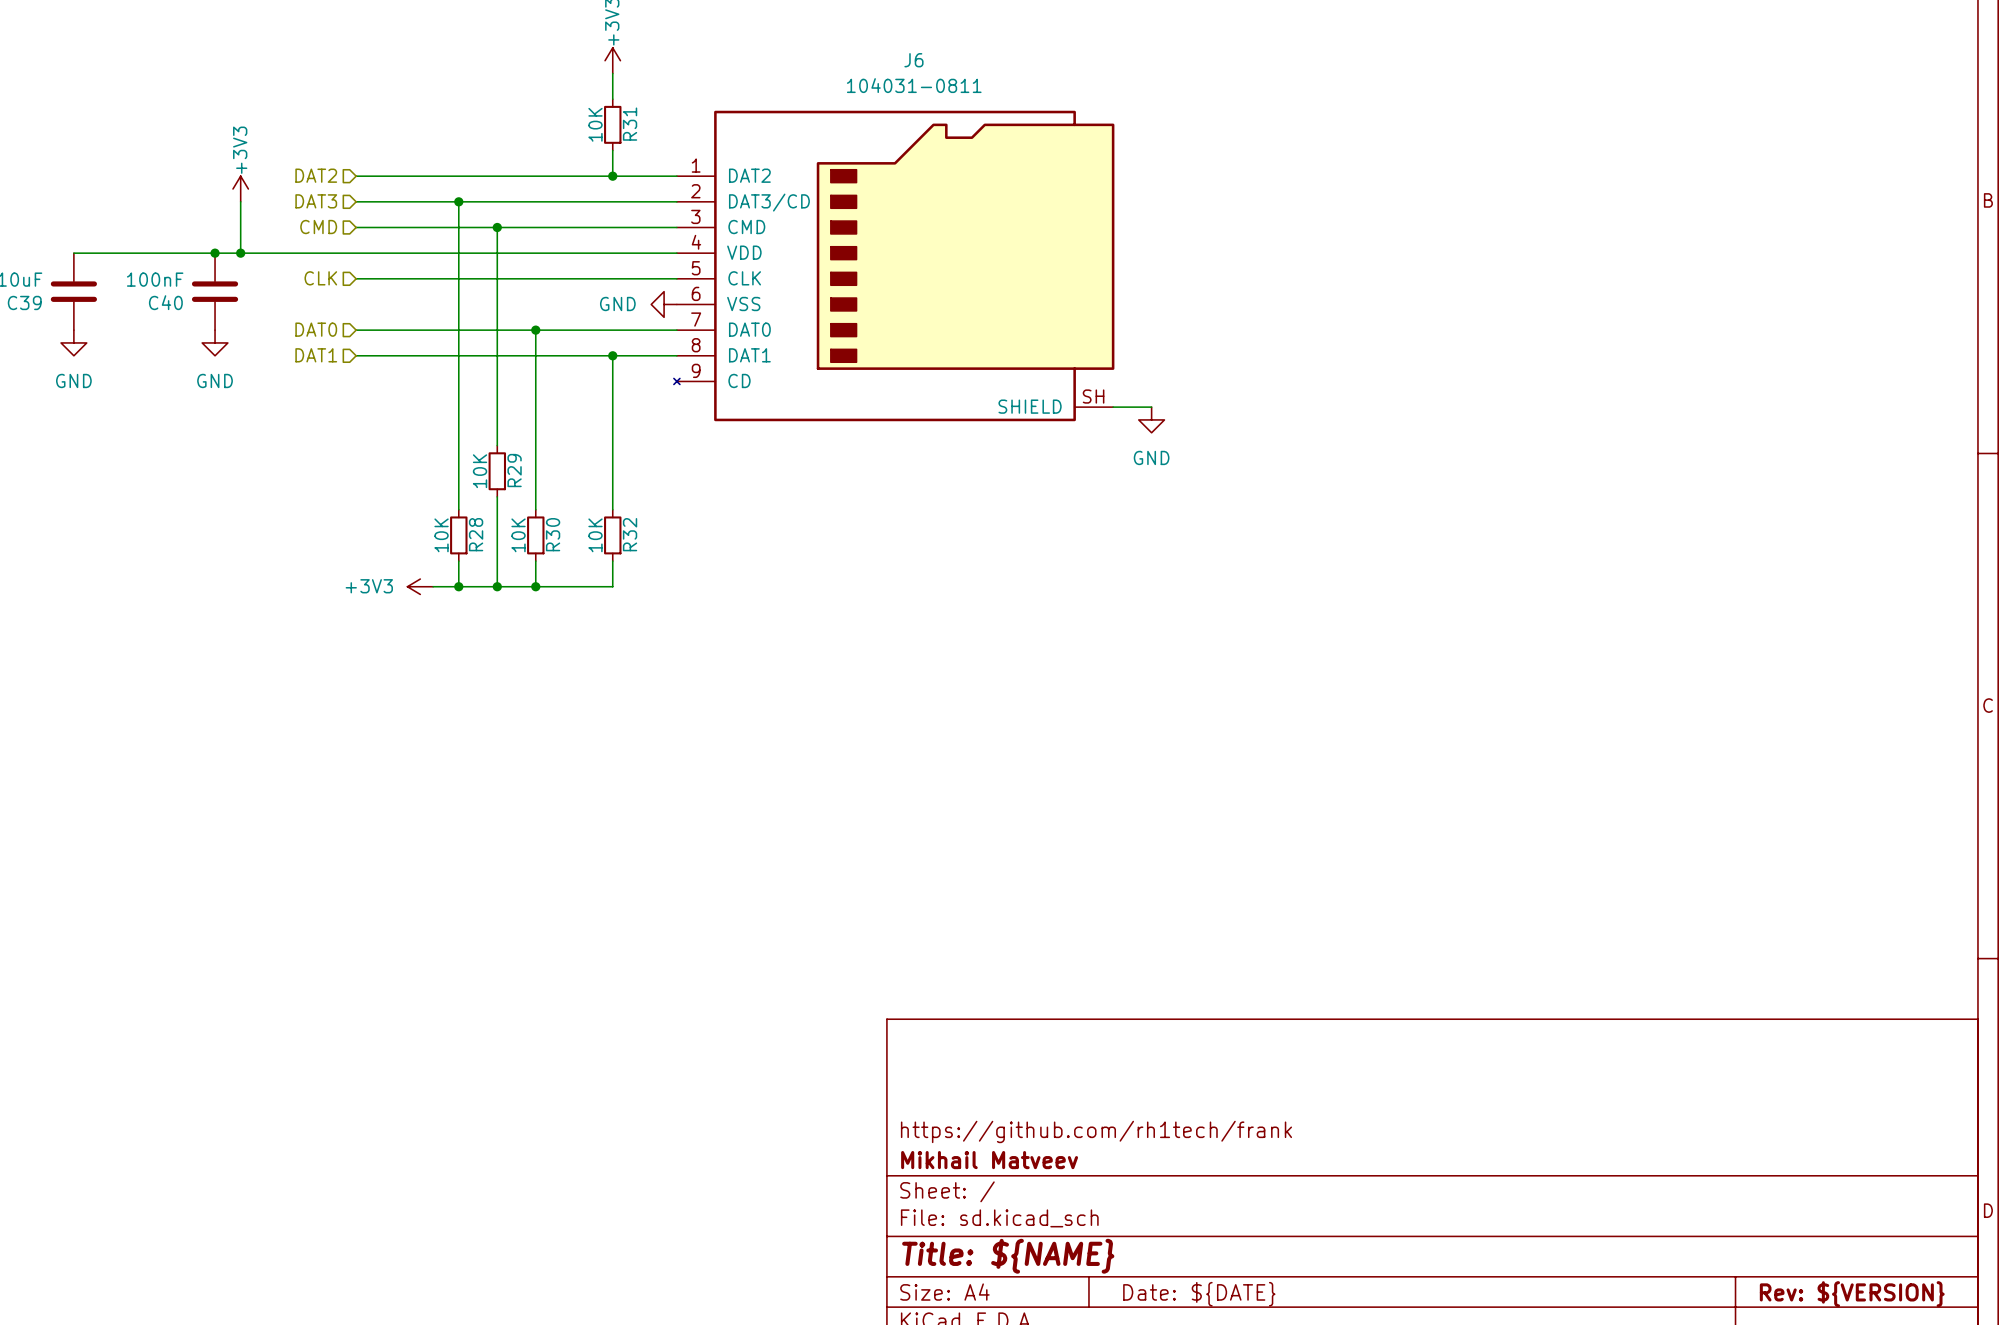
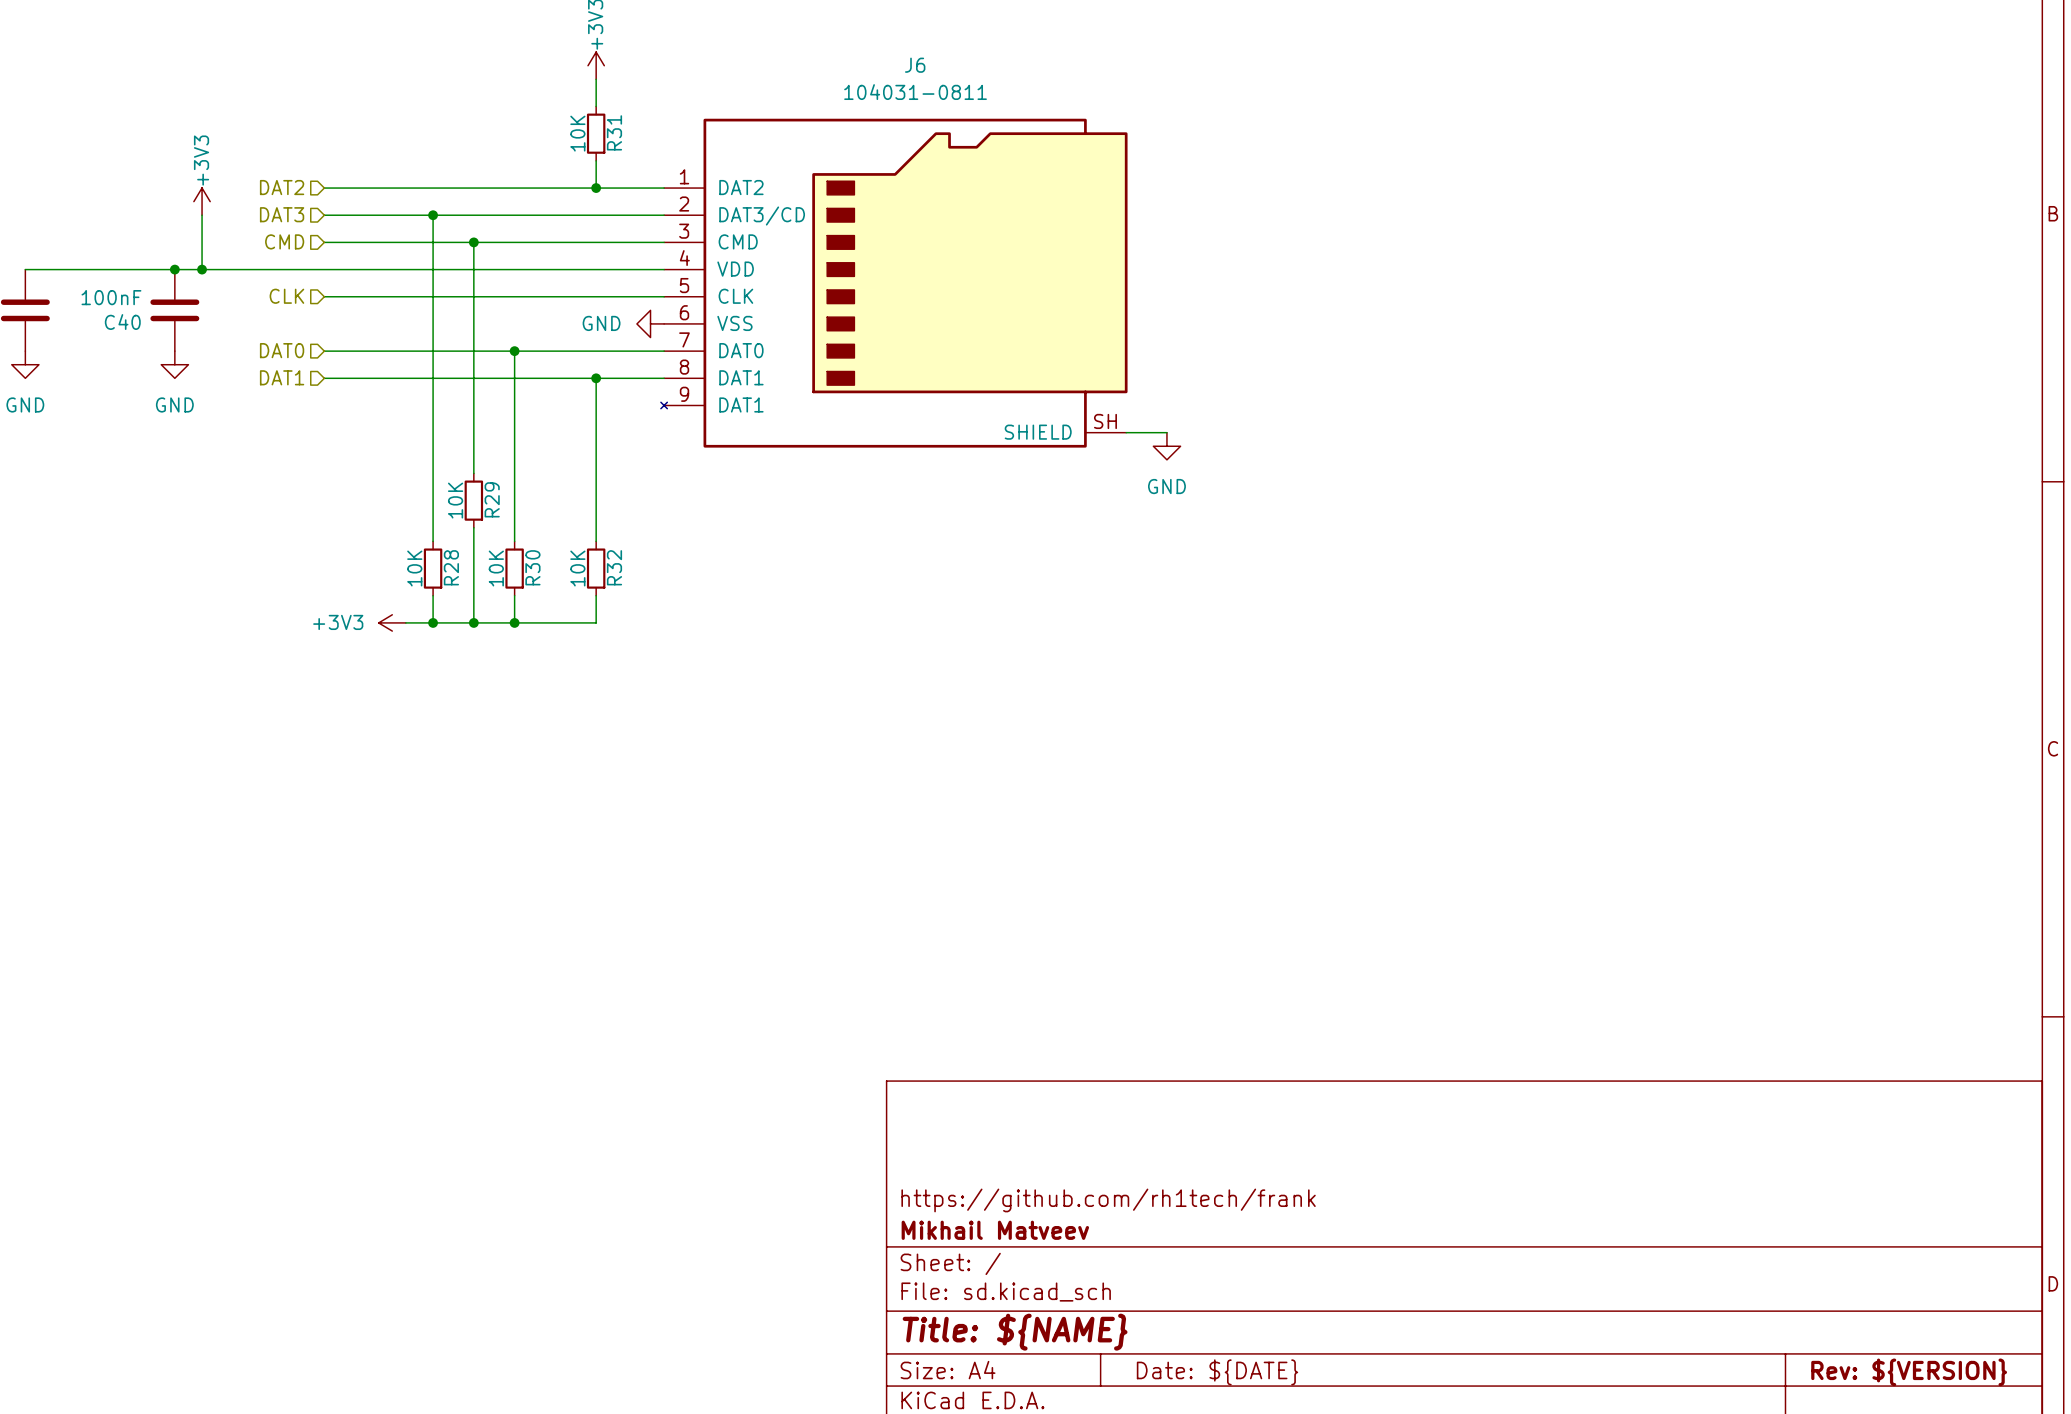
J6 pin name: CD (739, 380) -> DAT1 (741, 404)

